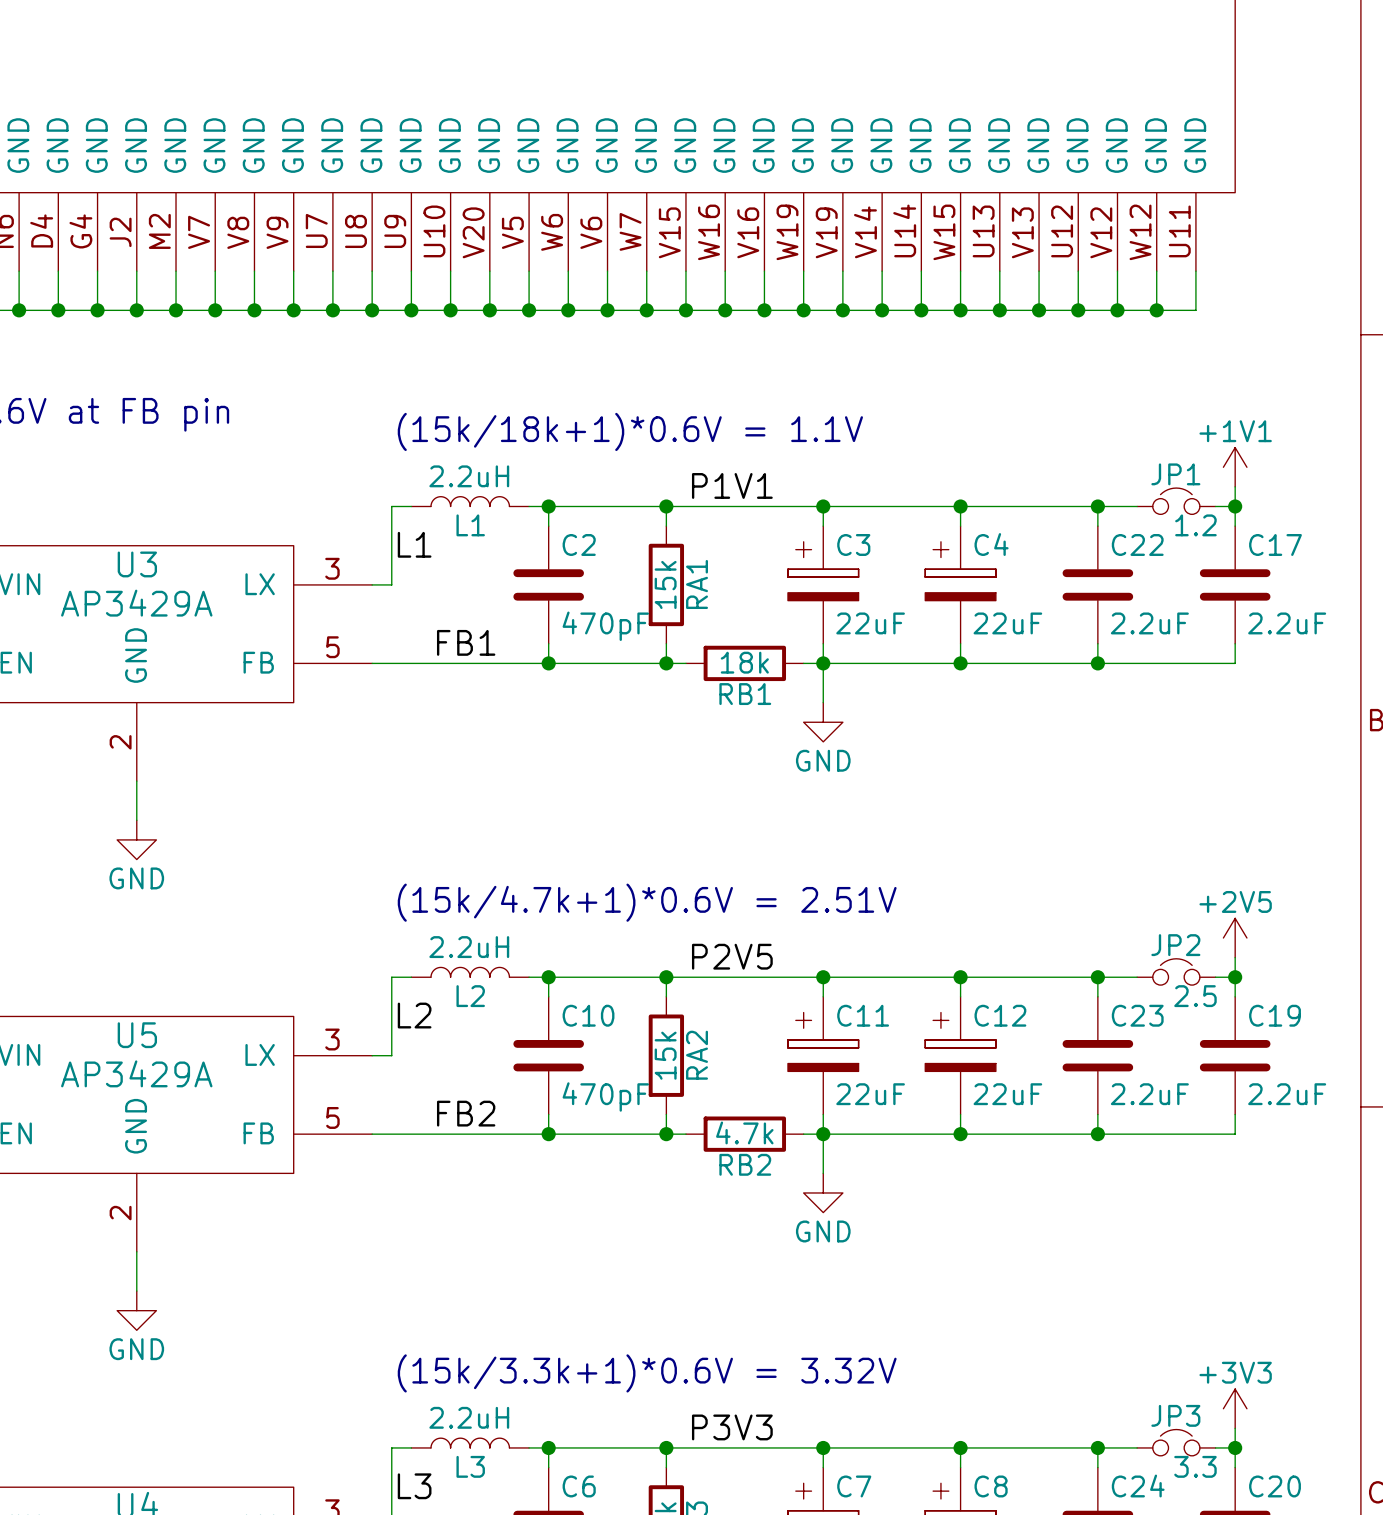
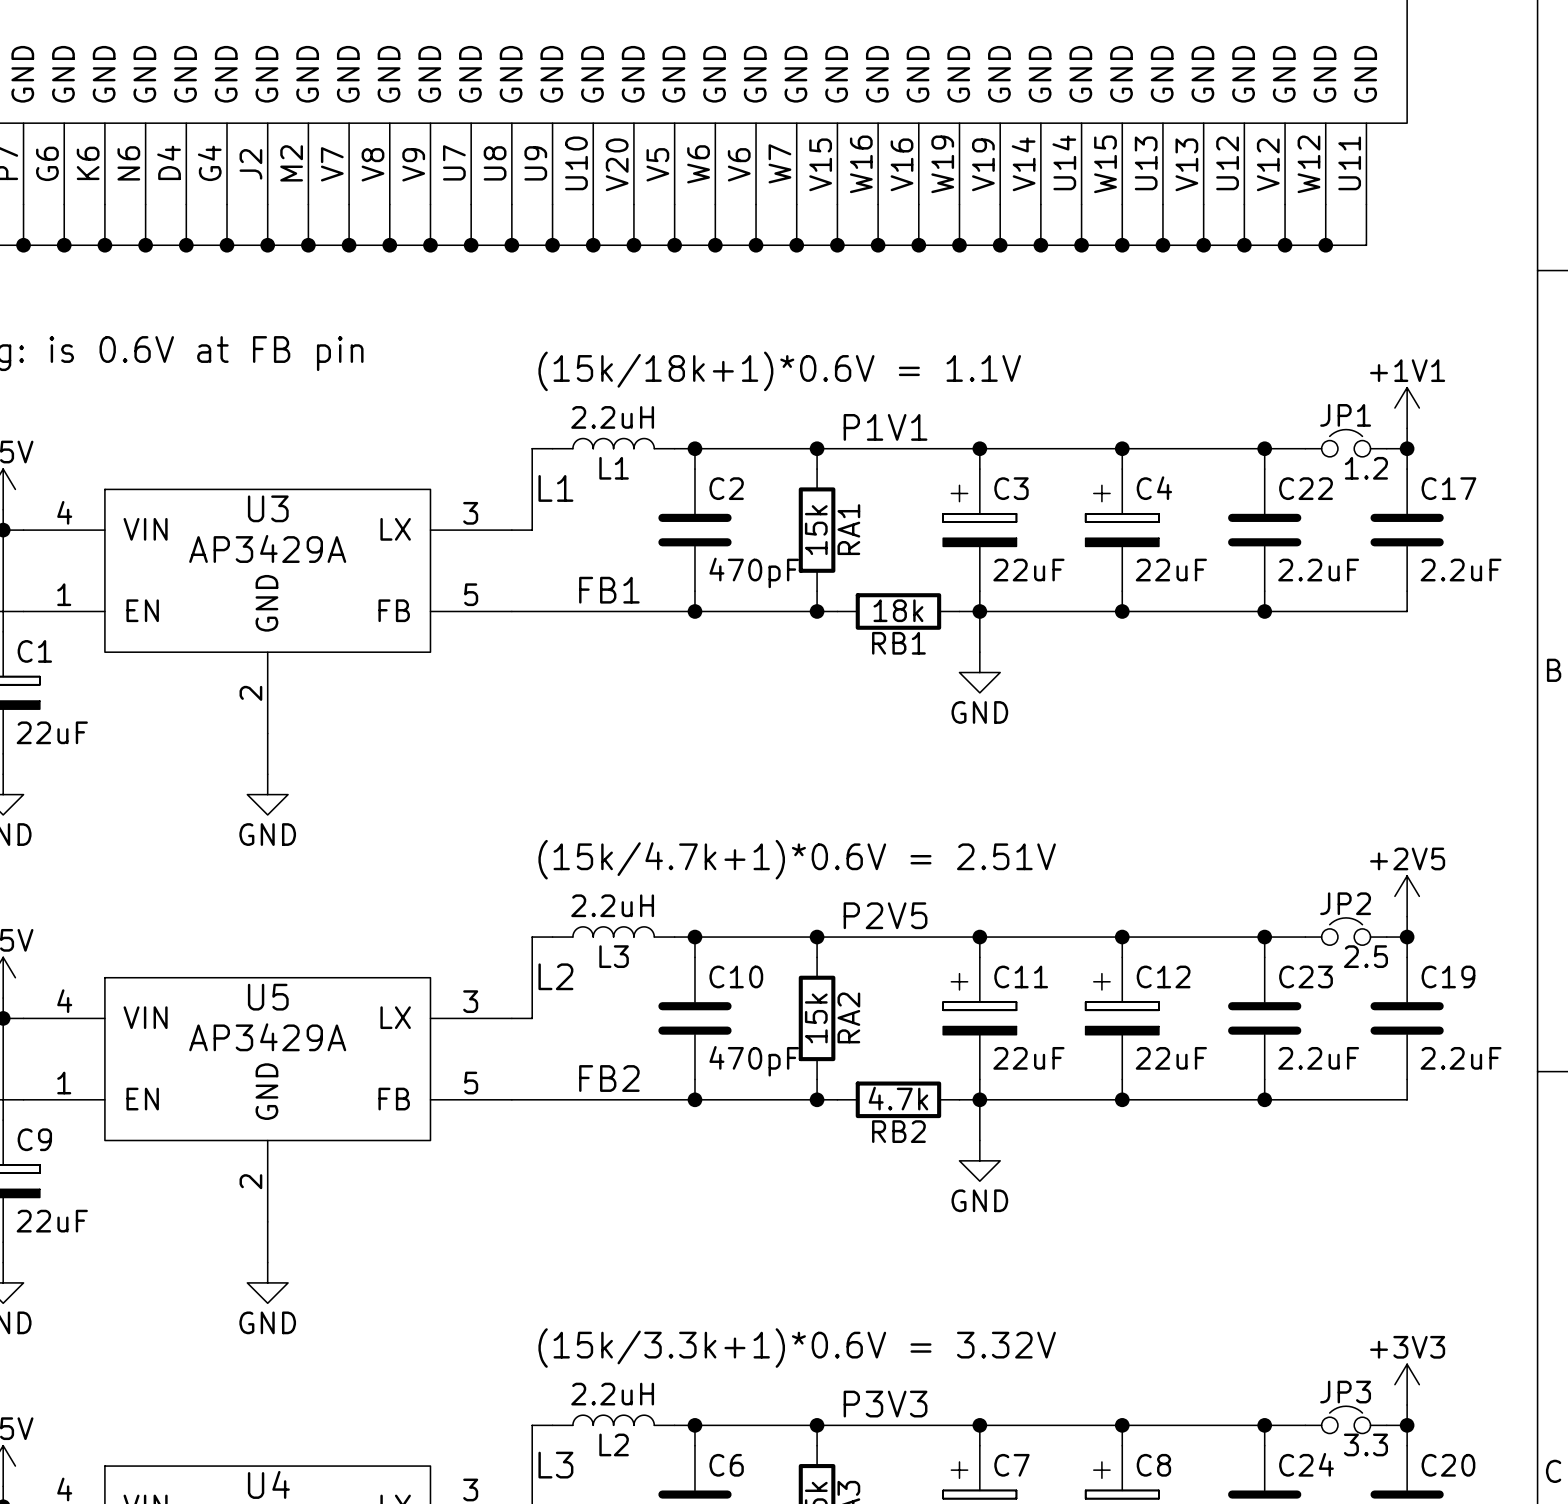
L2 name: L2 (470, 996) -> L3 (614, 956)
L3 name: L3 (470, 1466) -> L2 (614, 1444)

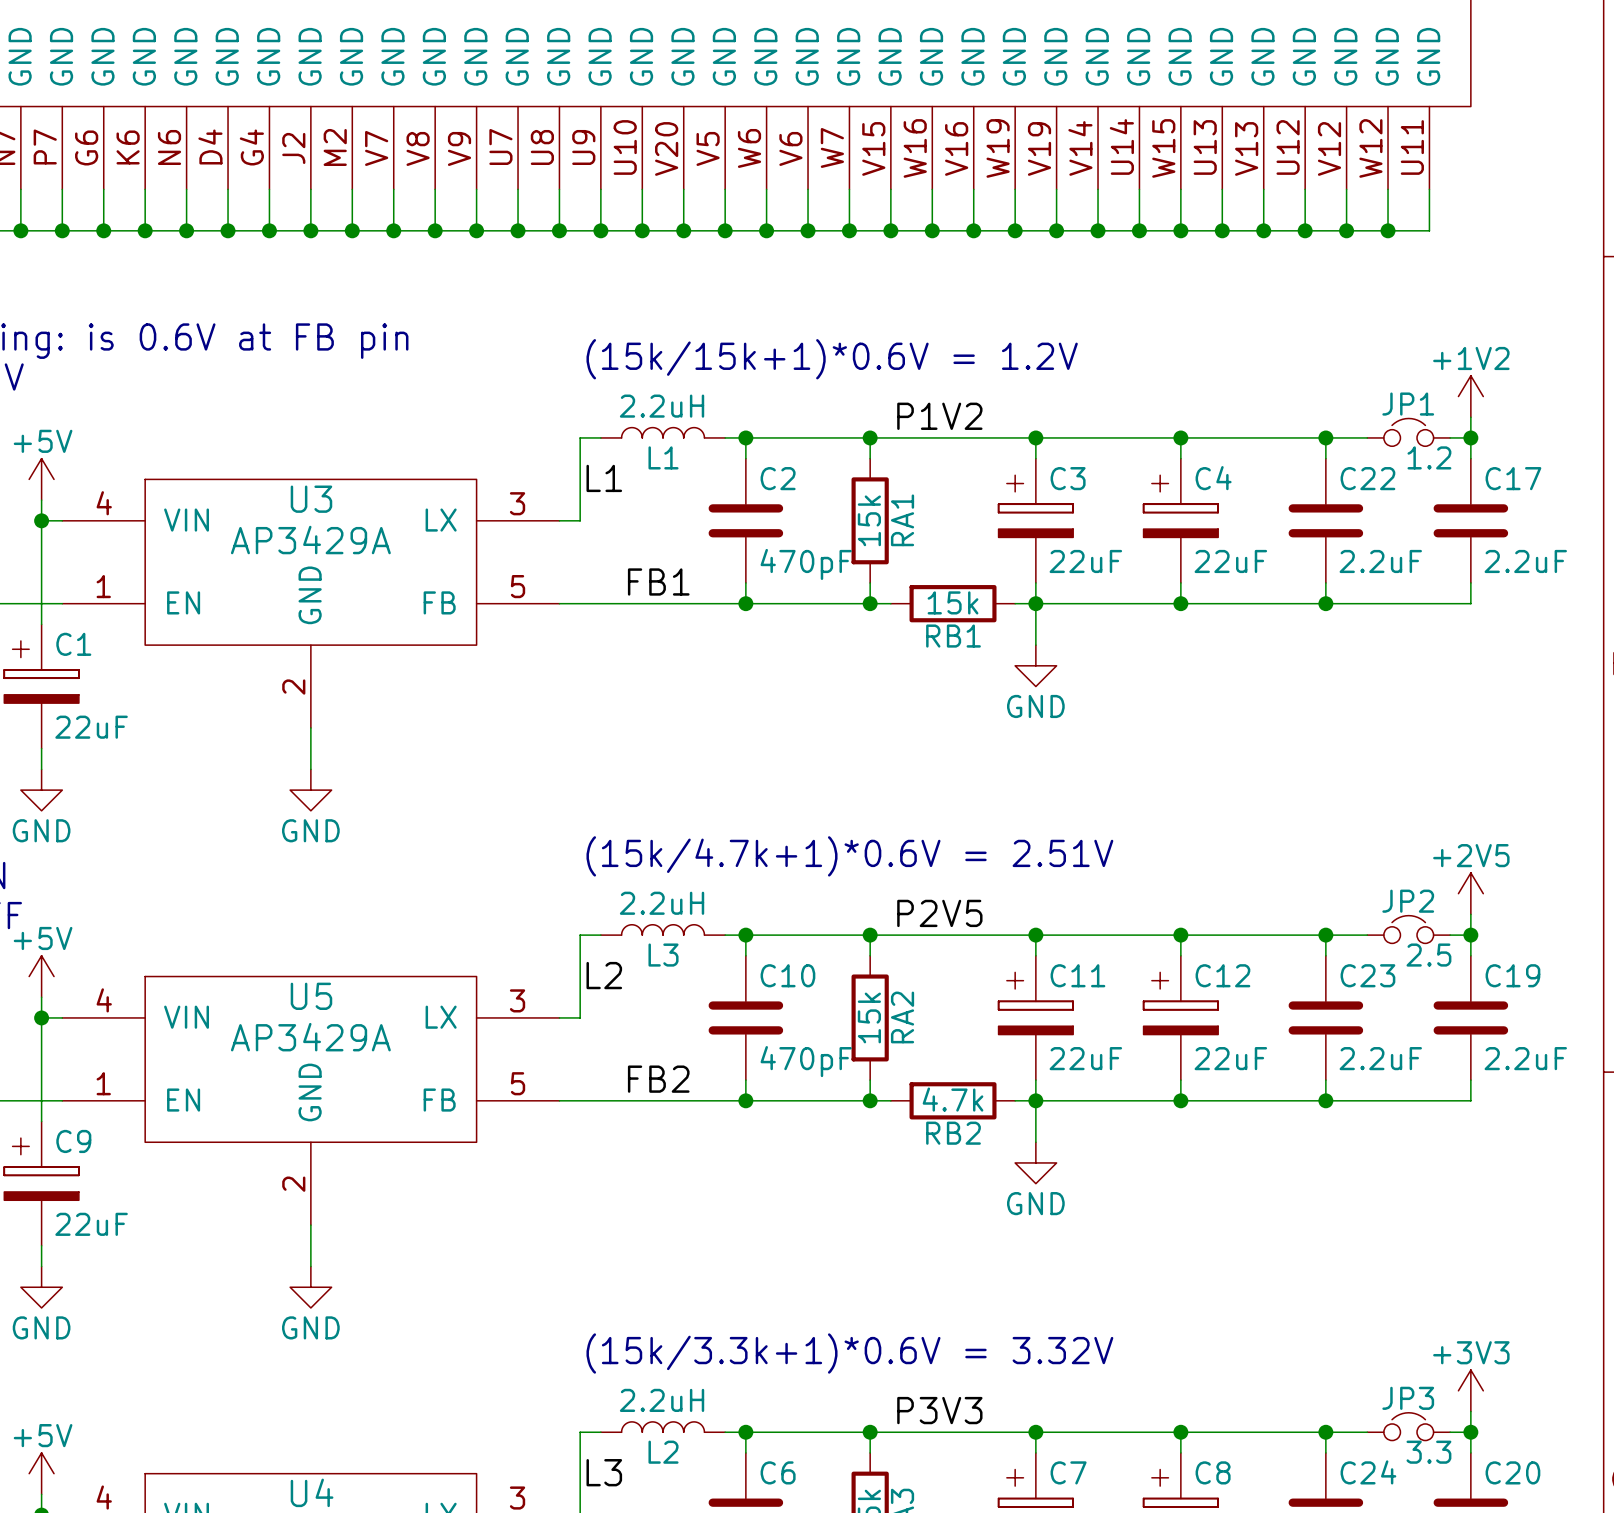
text: (15k/18k+1)*0.6V = 1.1V (779, 371) -> (15k/15k+1)*0.6V = 1.2V (832, 359)
power symbol: +1V1 (1407, 408) -> +1V2 (1470, 396)
label: P1V1 (885, 427) -> P1V2 (939, 416)
RB1 value: 18k (898, 610) -> 15k (953, 602)

